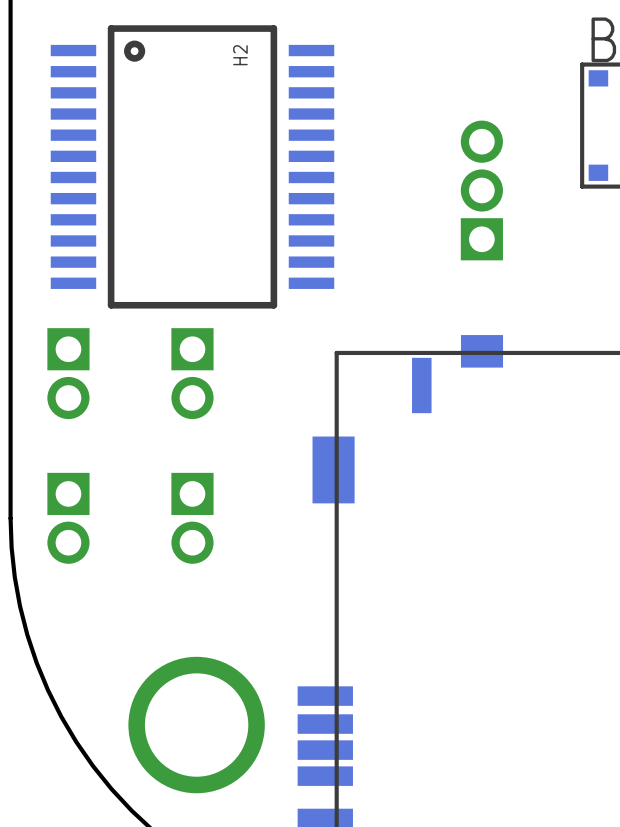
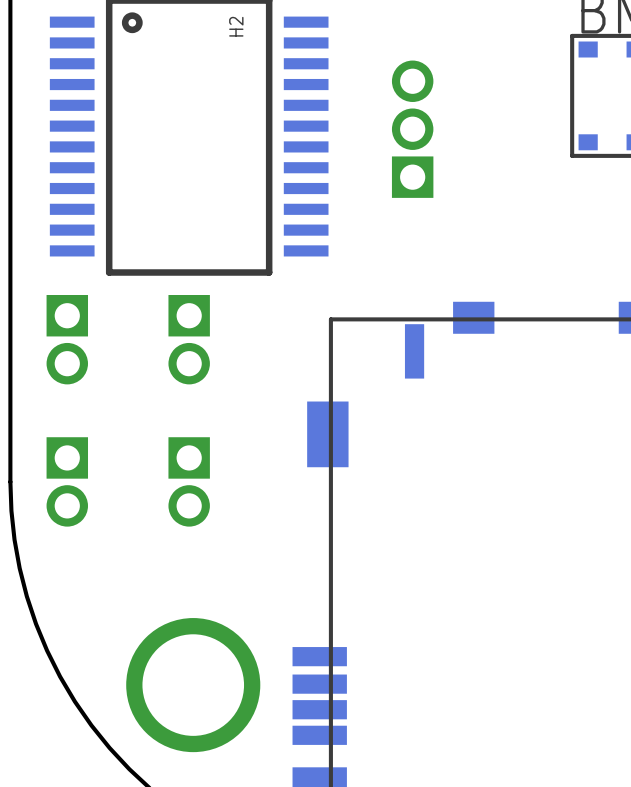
part position: (481, 190) -> (412, 129)

